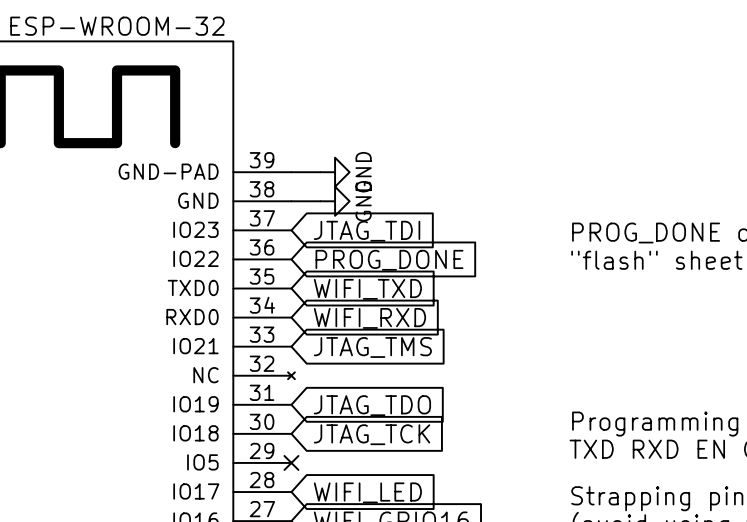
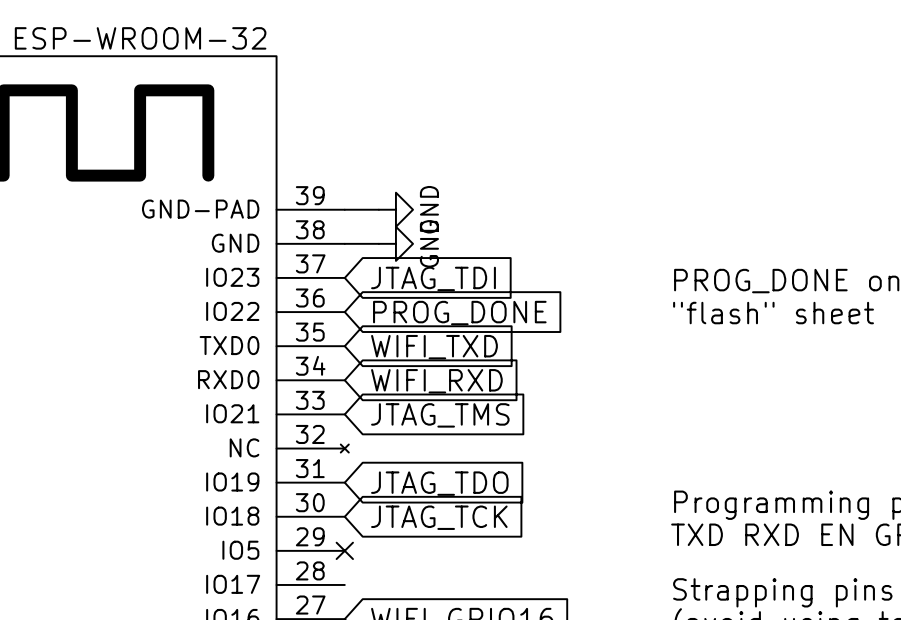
global label: WIFI_LED (367, 492) -> none

